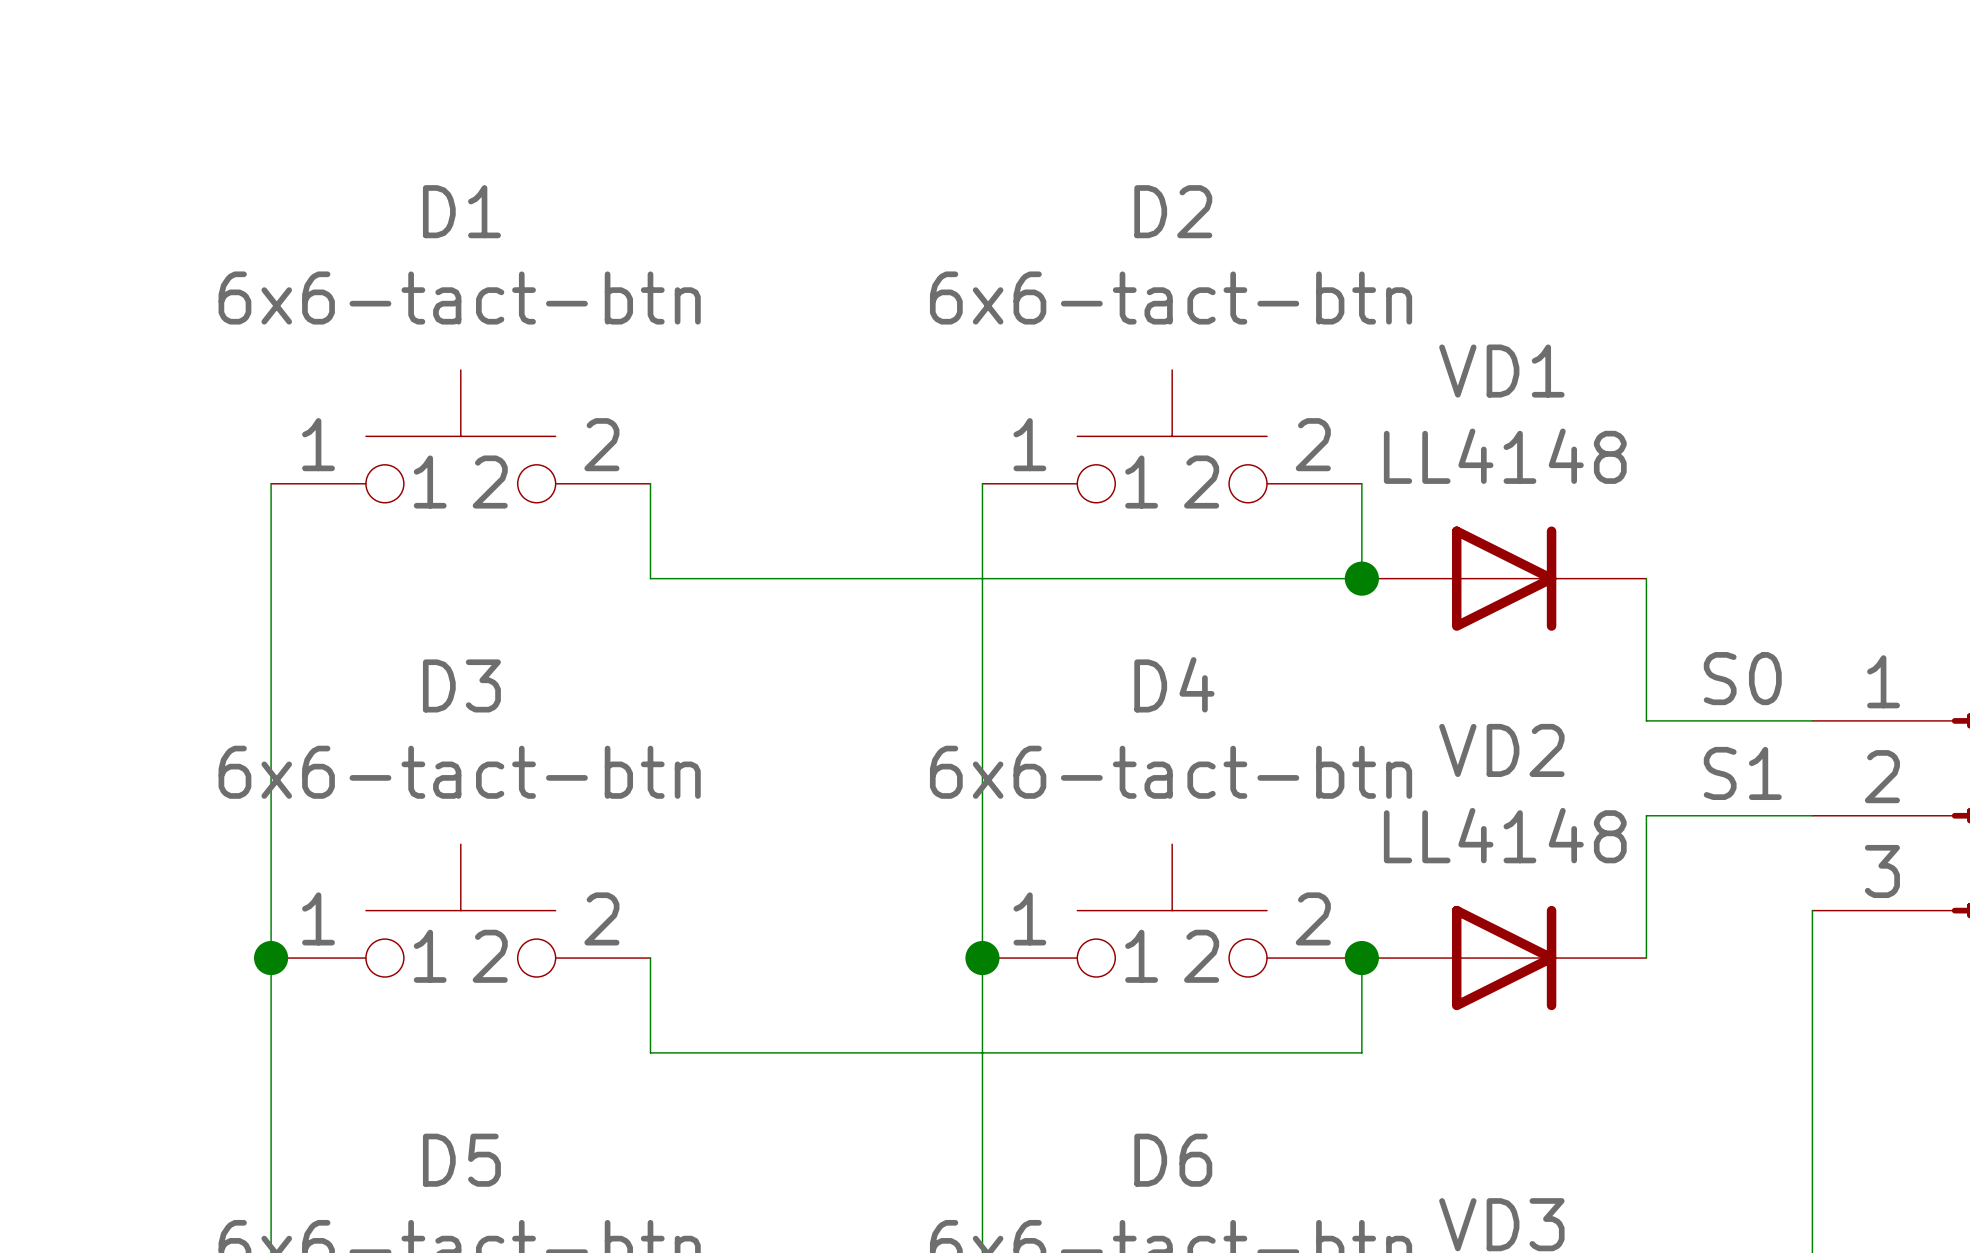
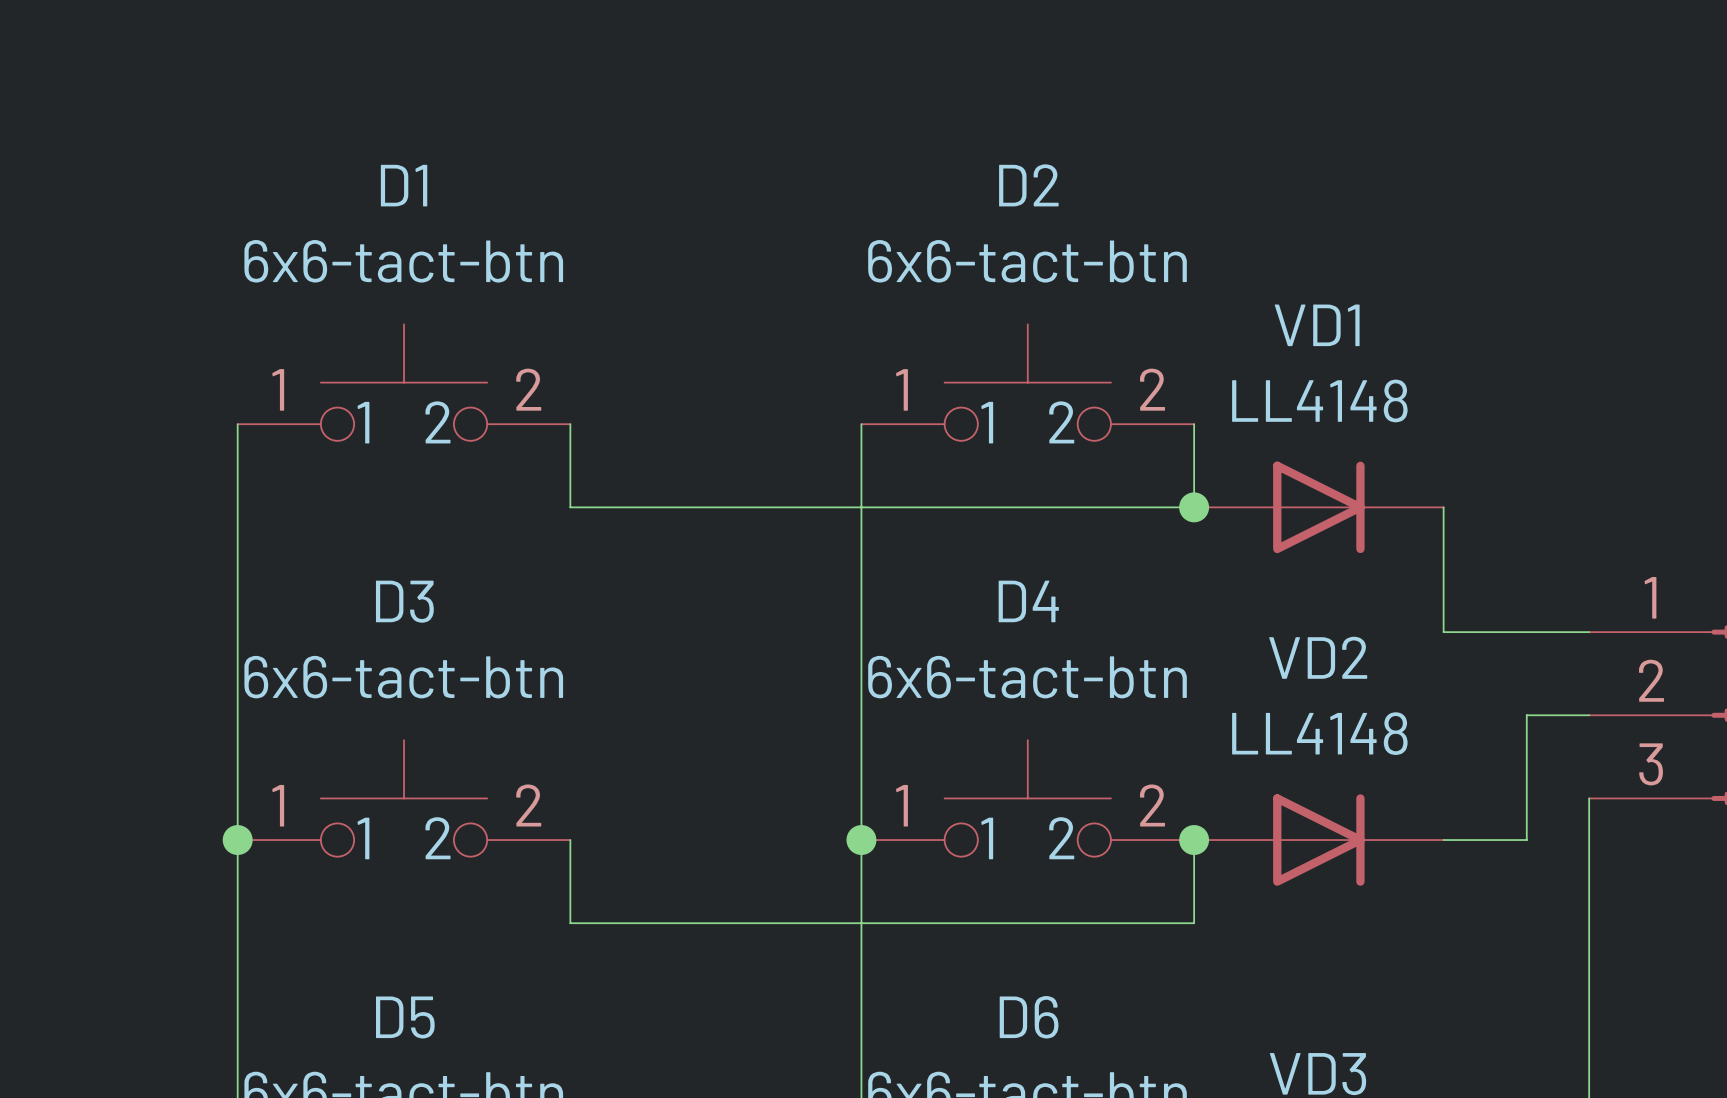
label: S0 (1742, 678) -> none
label: S1 (1742, 773) -> none
wire: (1741, 815) (1646, 815) (1646, 958) -> (1526, 715) (1526, 840) (1443, 840)

